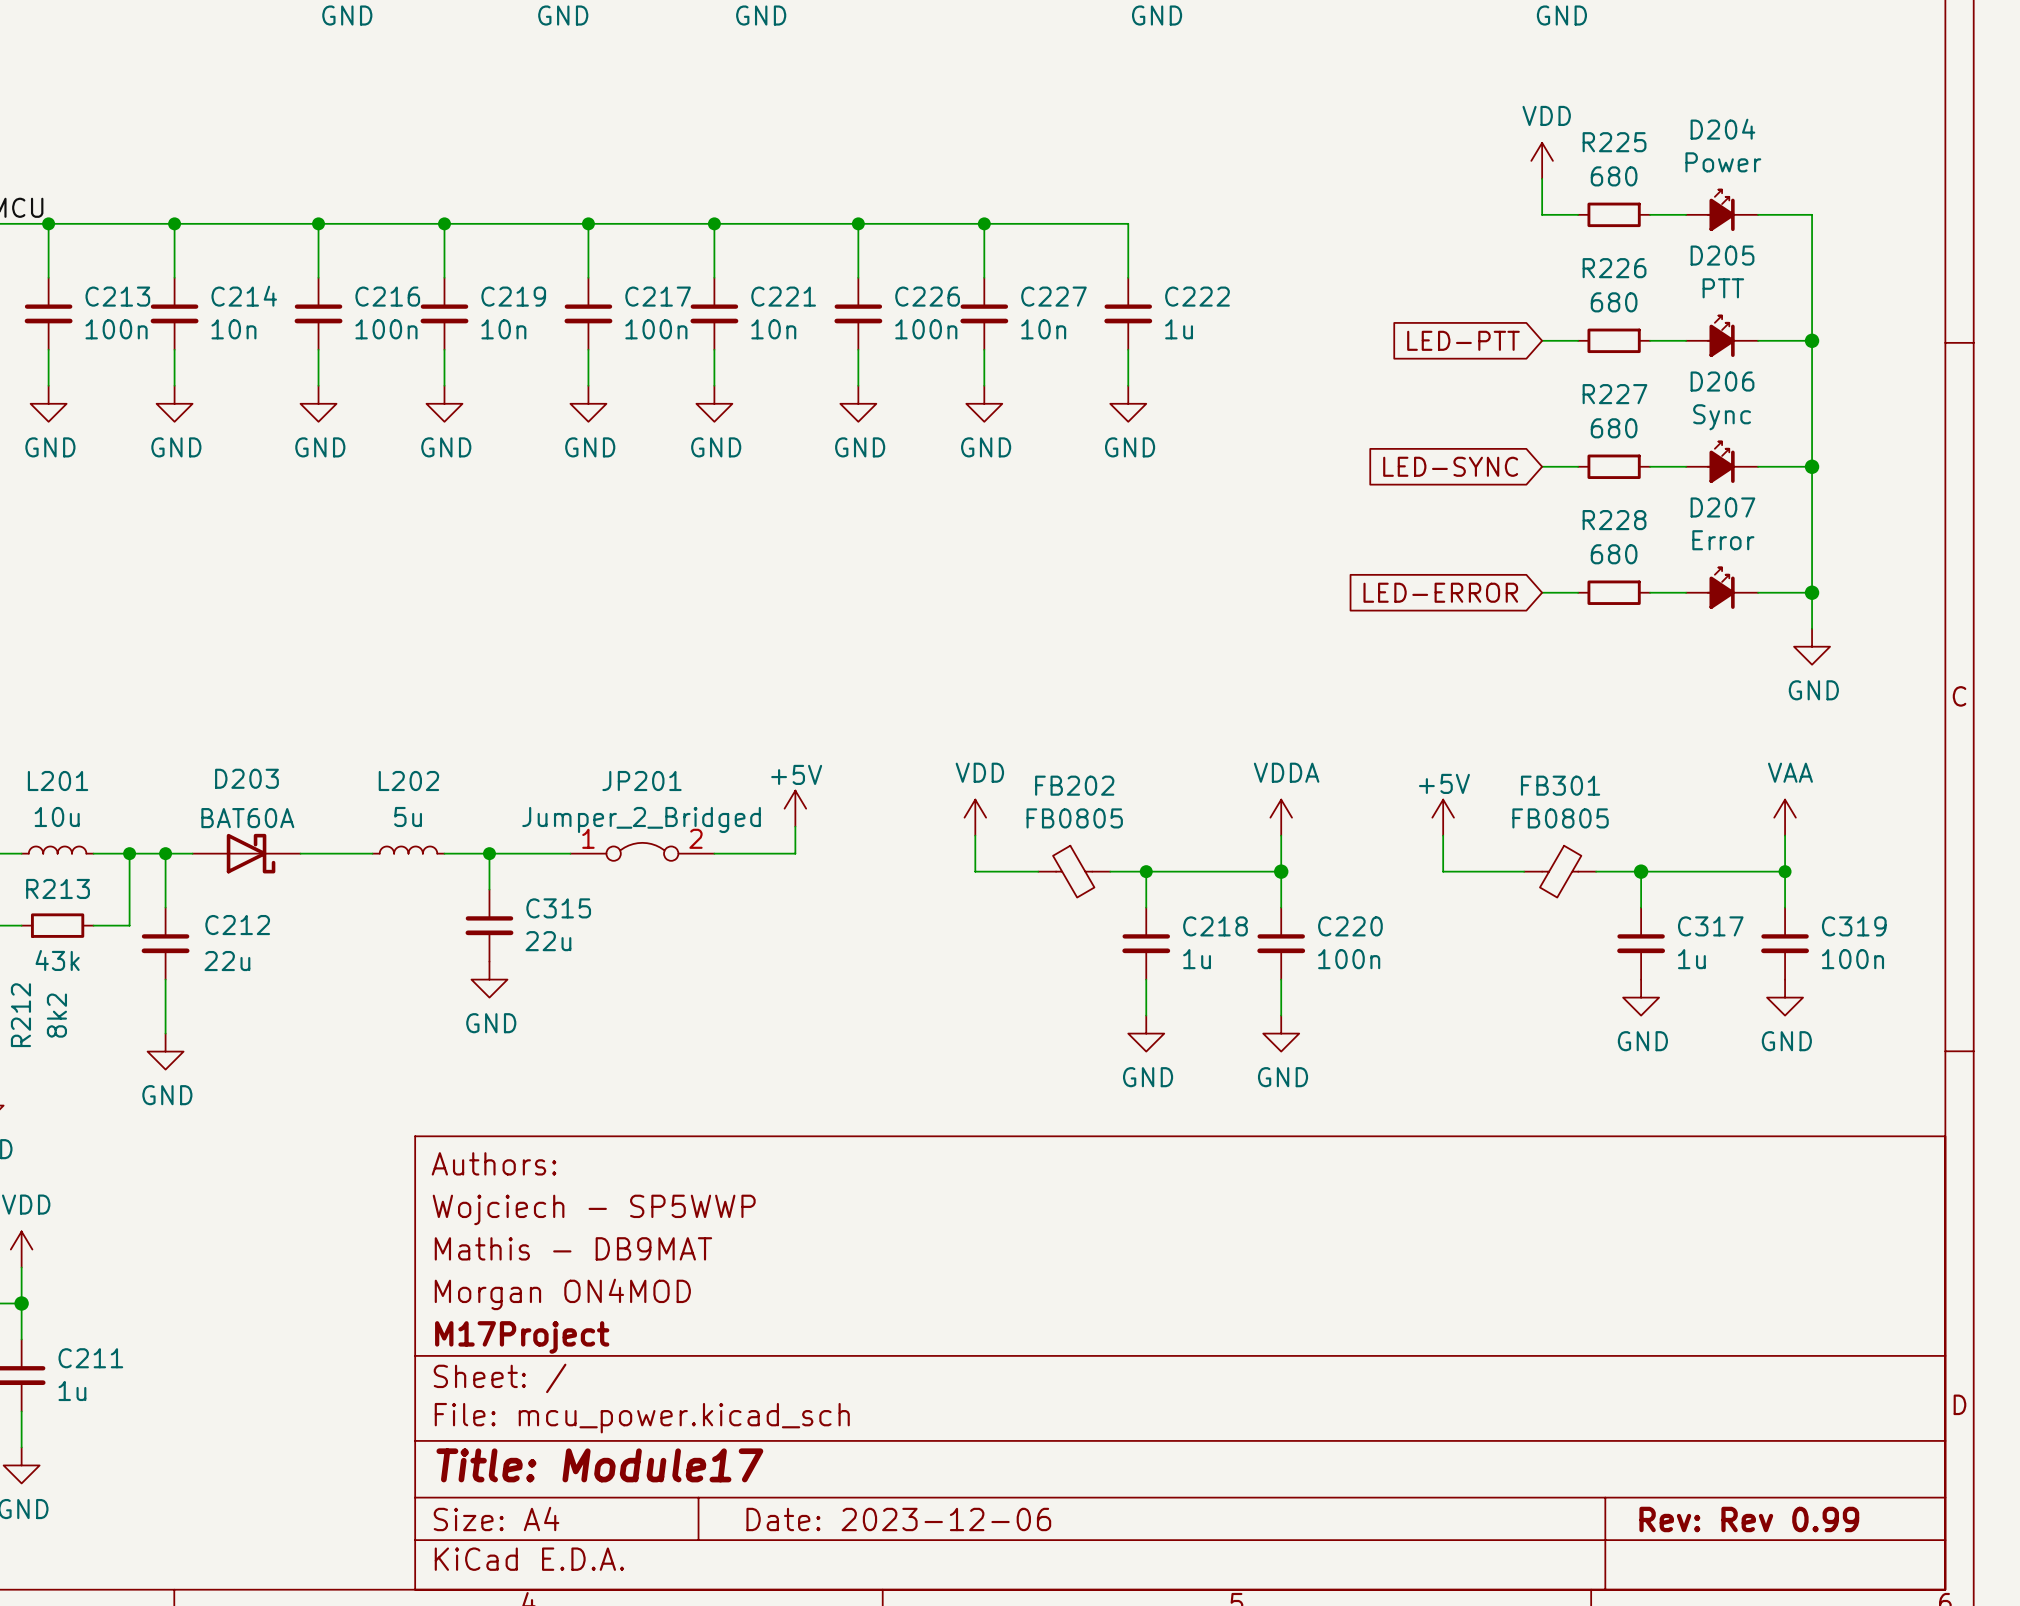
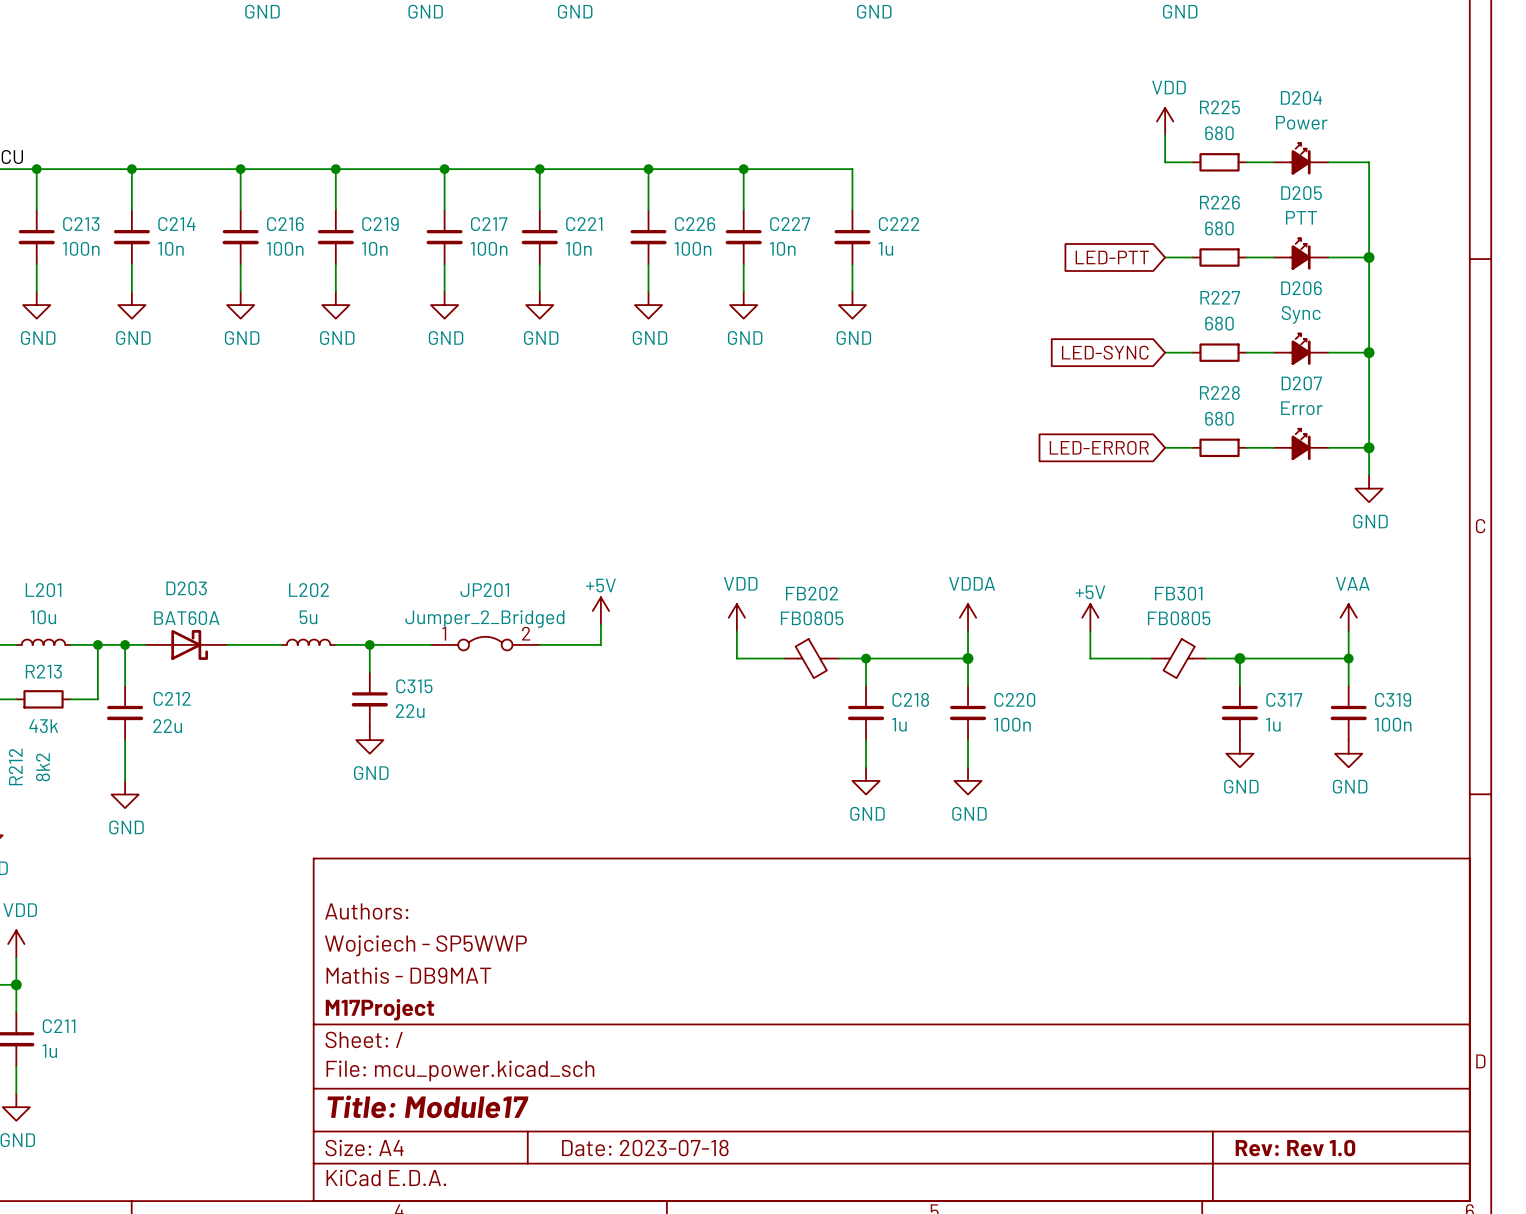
title block: Authors: (494, 1163) -> none
title block: Wojciech - SP5WWP (594, 1209) -> Authors: (366, 911)
title block: Mathis - DB9MAT (573, 1248) -> Wojciech - SP5WWP (425, 945)
title block: Morgan ON4MOD (562, 1294) -> Mathis - DB9MAT (408, 975)
title block: Date: 2023-12-06 (898, 1519) -> Date: 2023-07-18 (645, 1148)
title block: Rev: Rev 0.99 (1749, 1519) -> Rev: Rev 1.0 (1295, 1148)

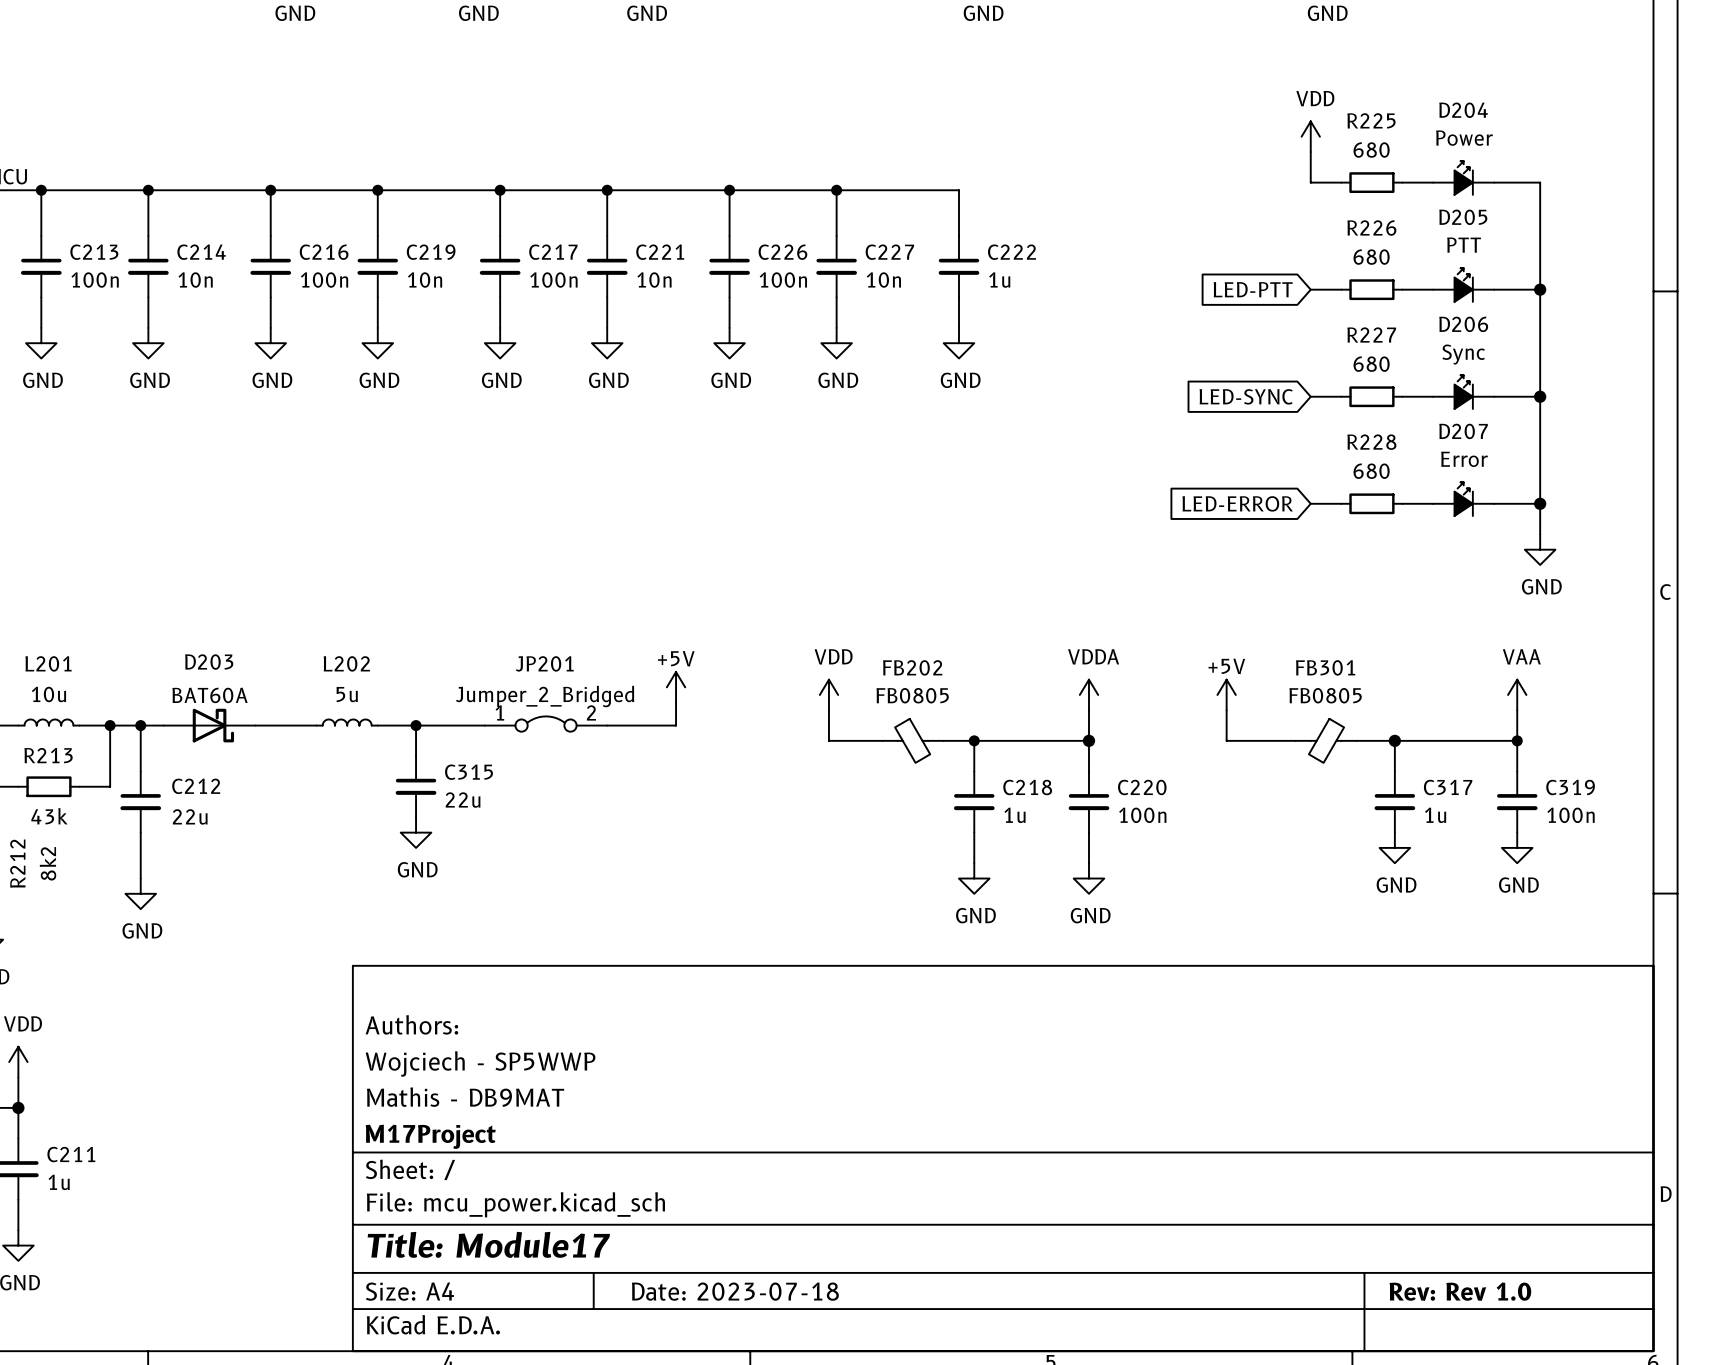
D204 symbol: [1273, 143, 1329, 175] -> [1433, 161, 1495, 195]
D205 symbol: [1273, 238, 1329, 270] -> [1433, 268, 1495, 302]
D206 symbol: [1273, 333, 1329, 365] -> [1433, 375, 1495, 409]
D207 symbol: [1273, 428, 1329, 461] -> [1433, 482, 1495, 517]

